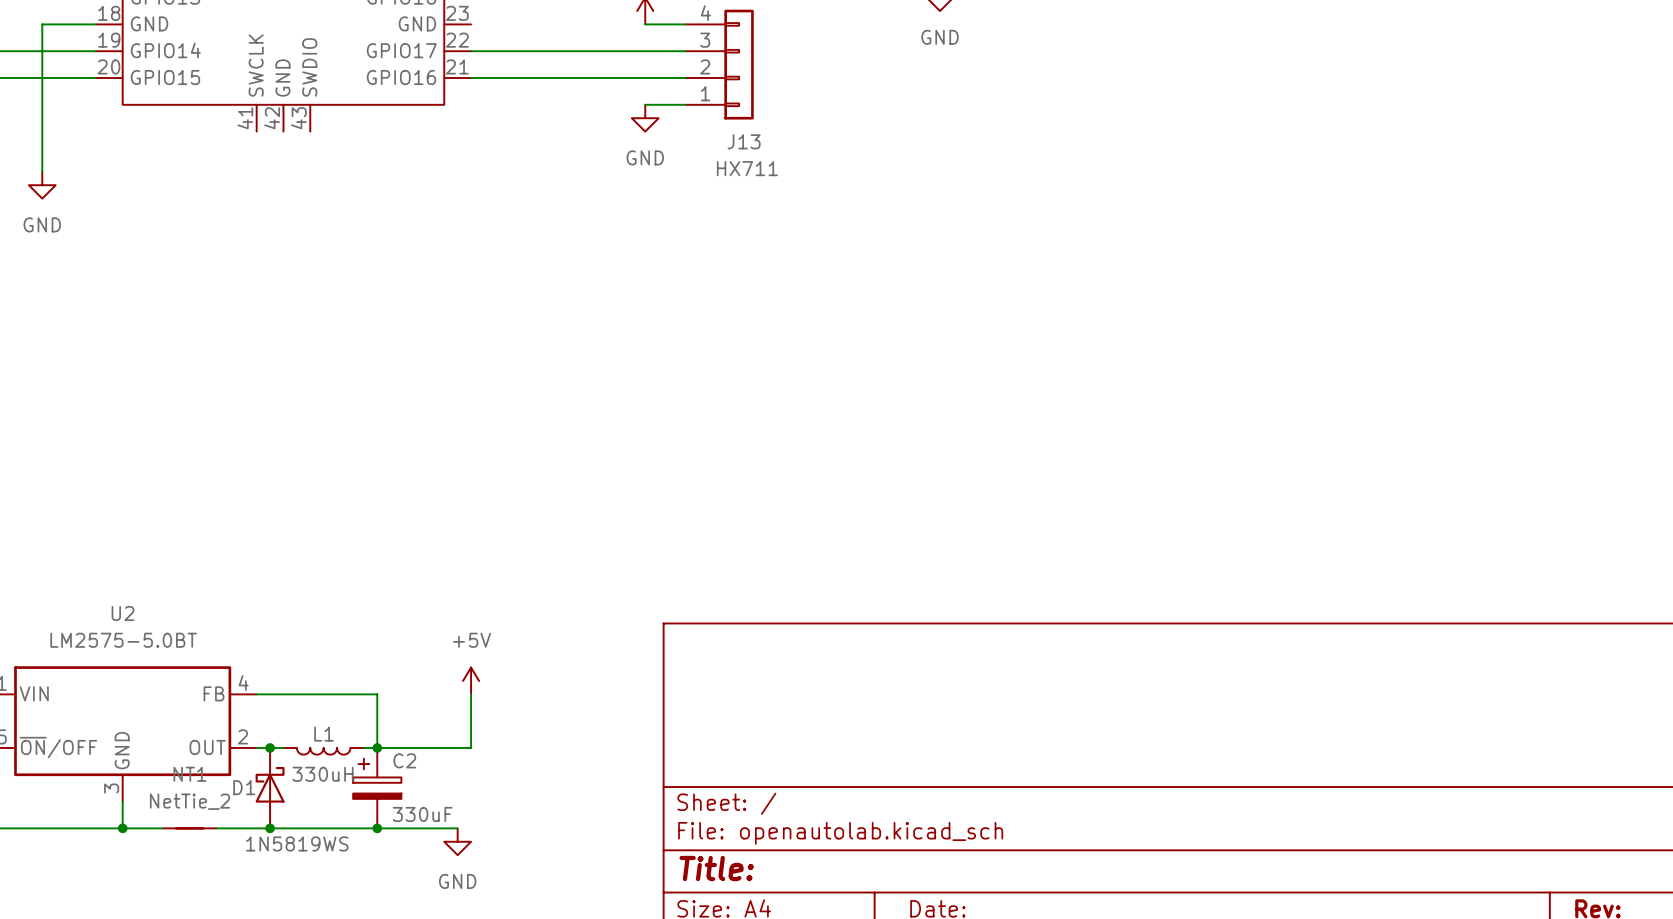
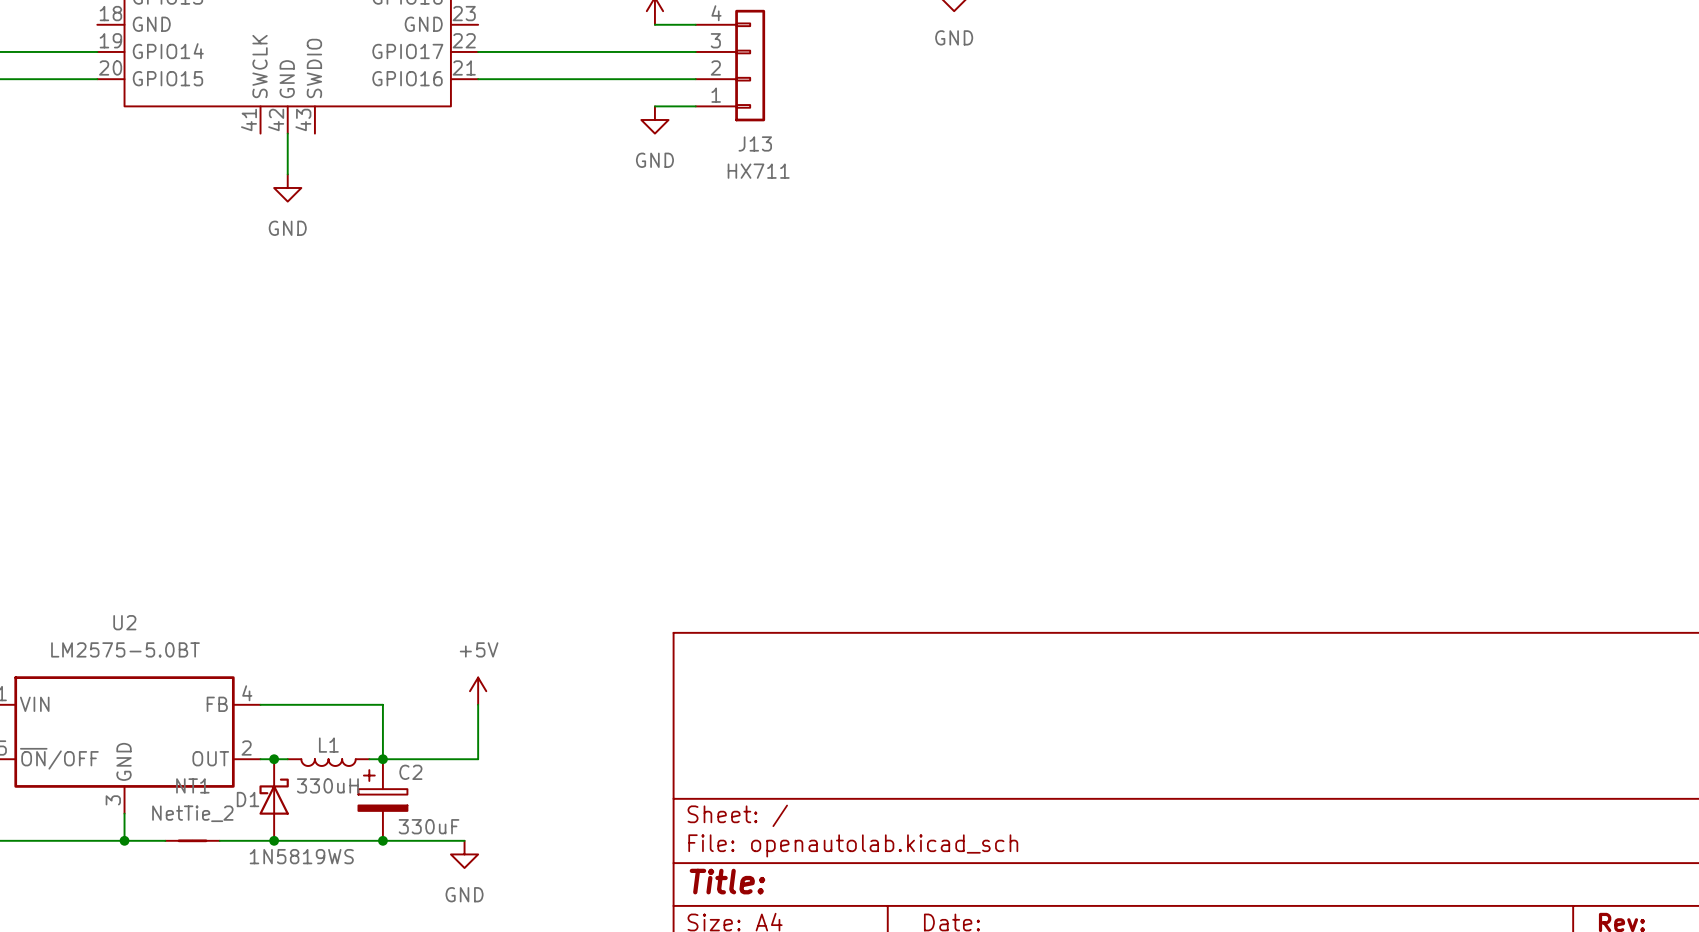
wire: (95, 24) (42, 24) (42, 171) -> none
wire: none -> (287, 133) (287, 174)
power symbol position: GND (42, 185) -> GND (287, 187)

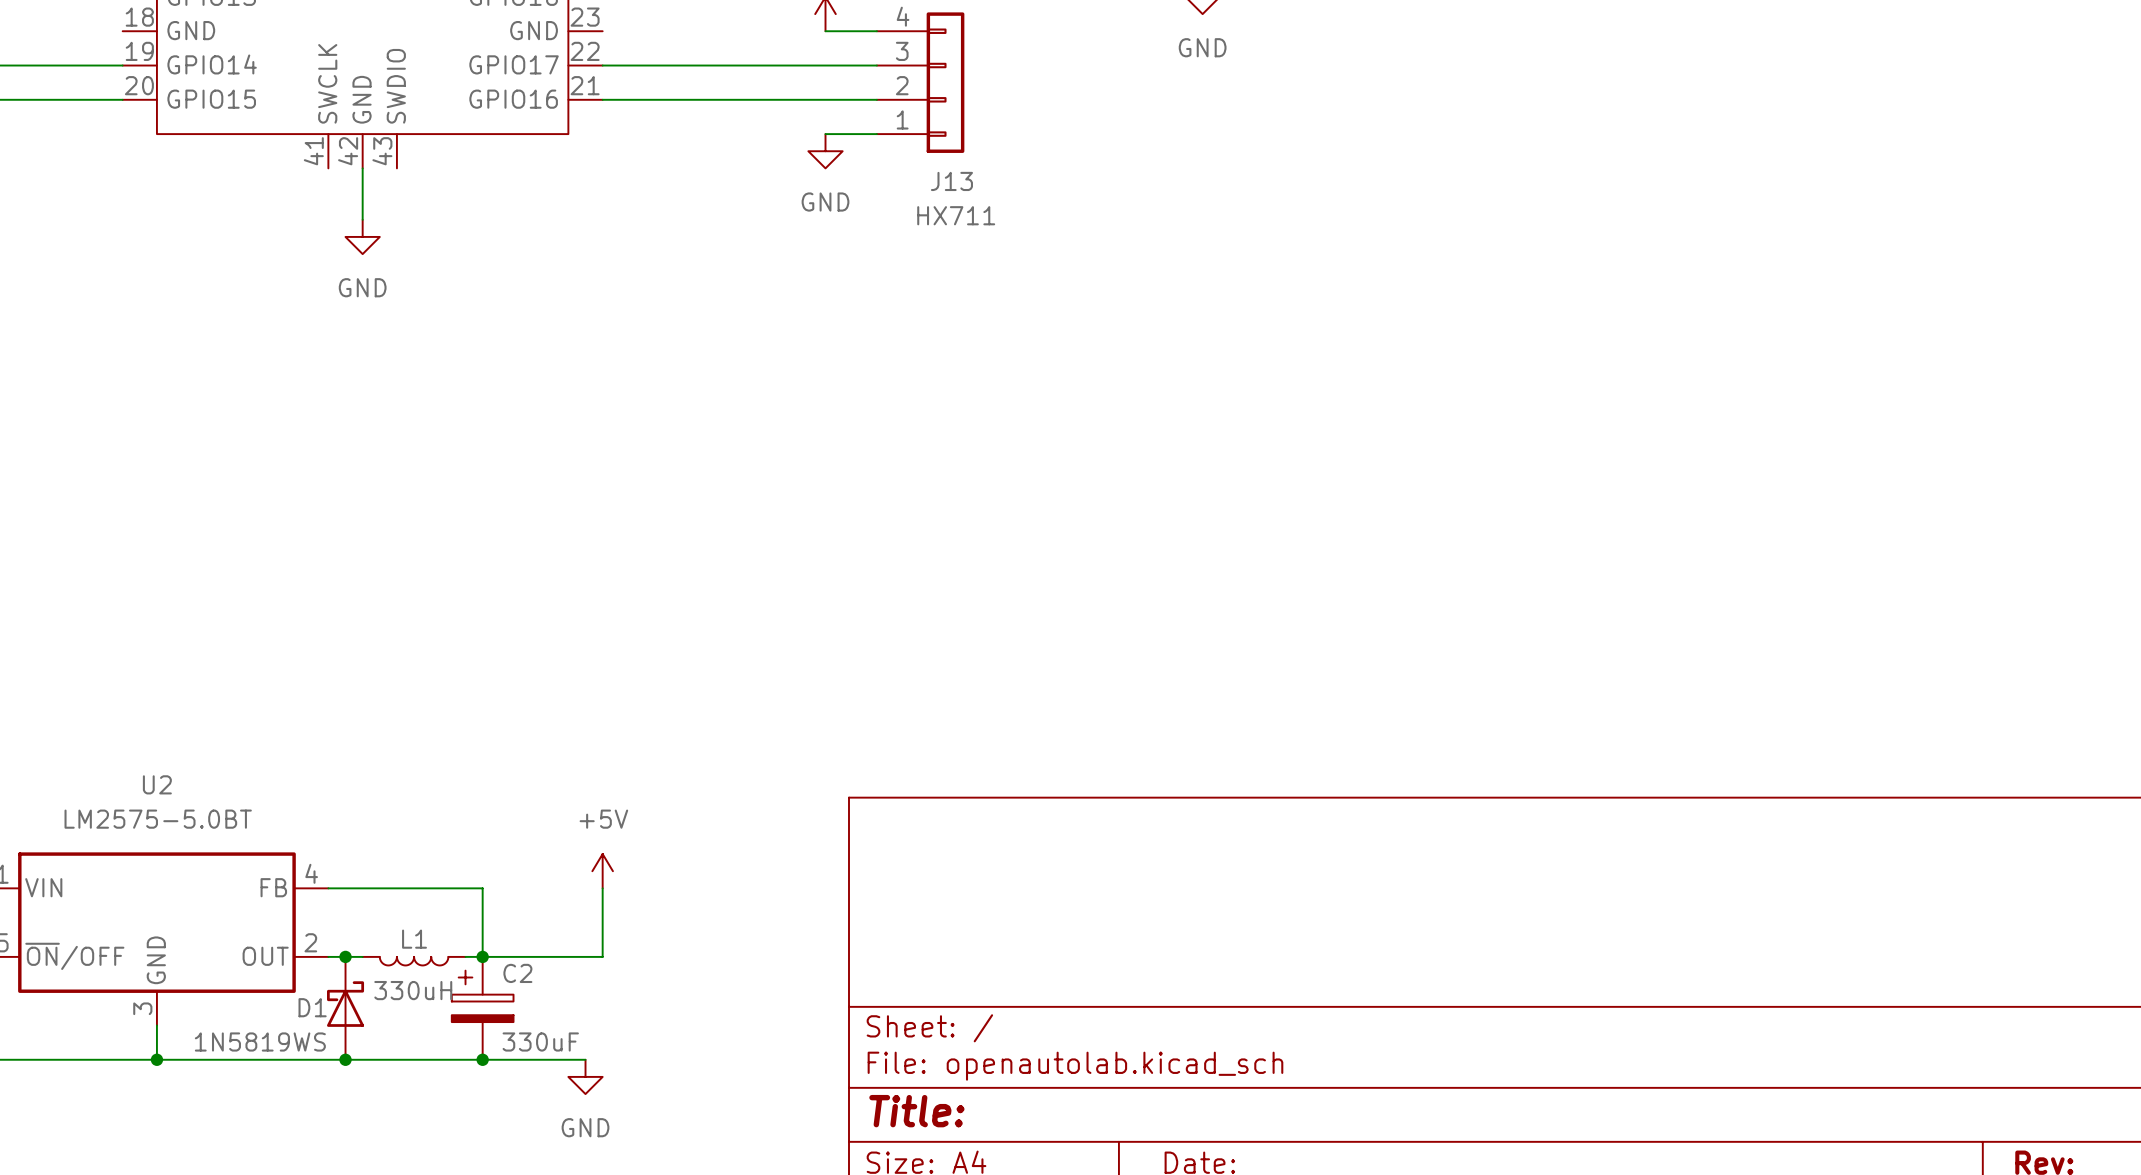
NT1: NetTie_2 (192, 840) -> none
D1 value position: 1N5819WS (301, 856) -> 1N5819WS (260, 1041)

